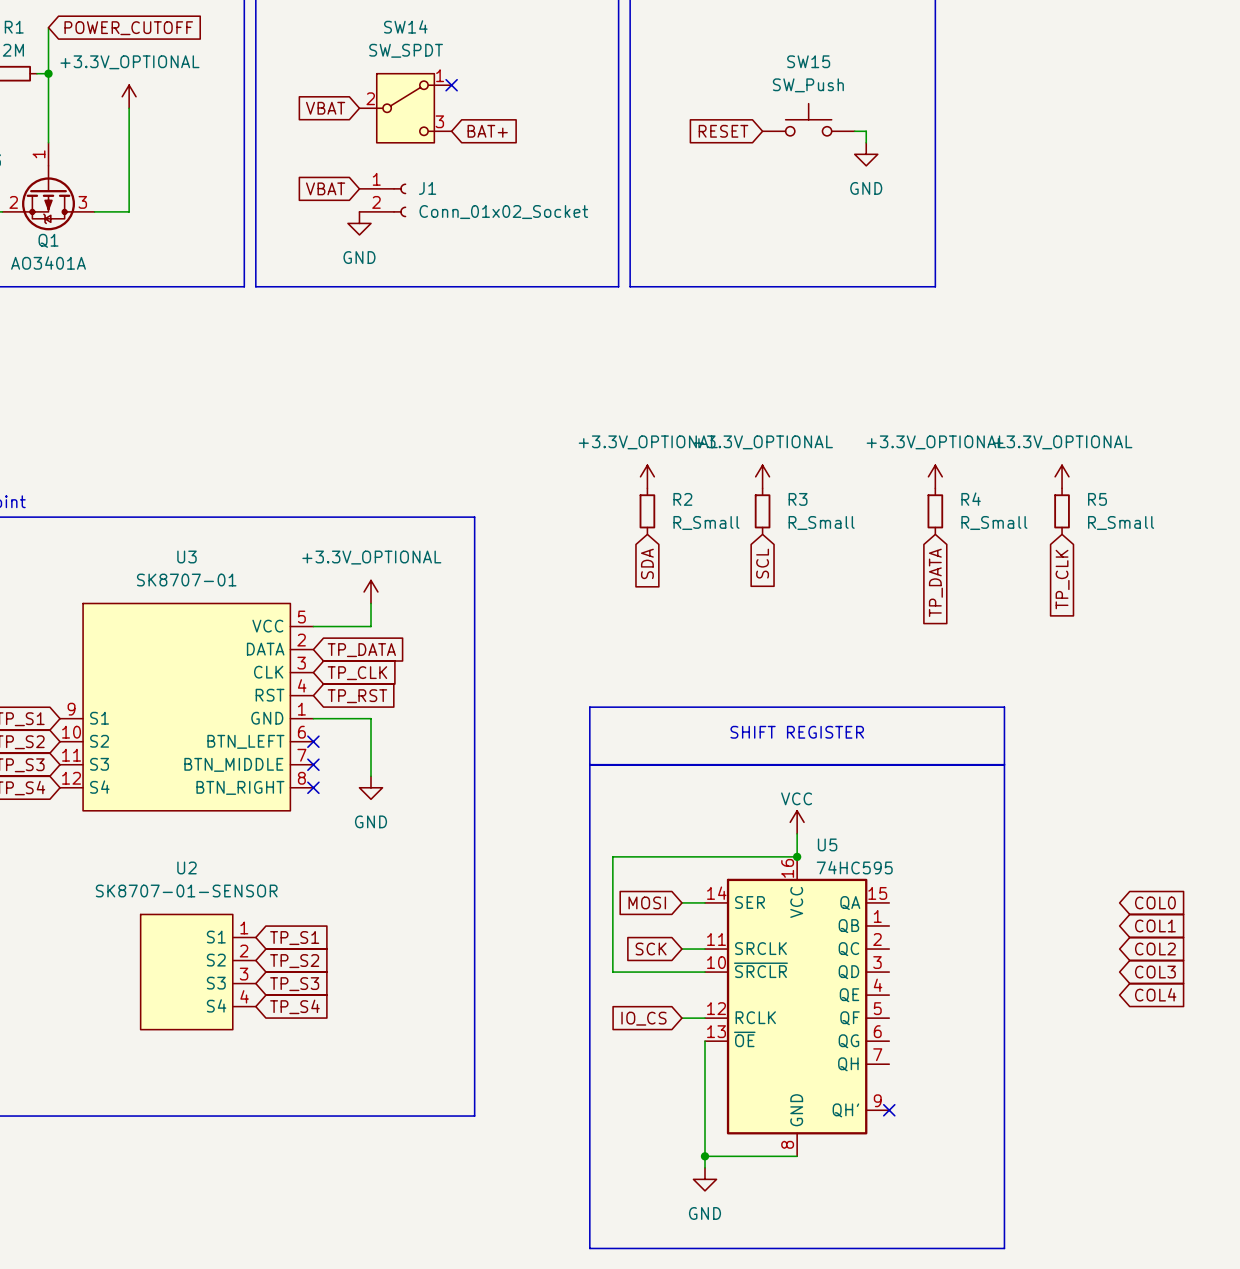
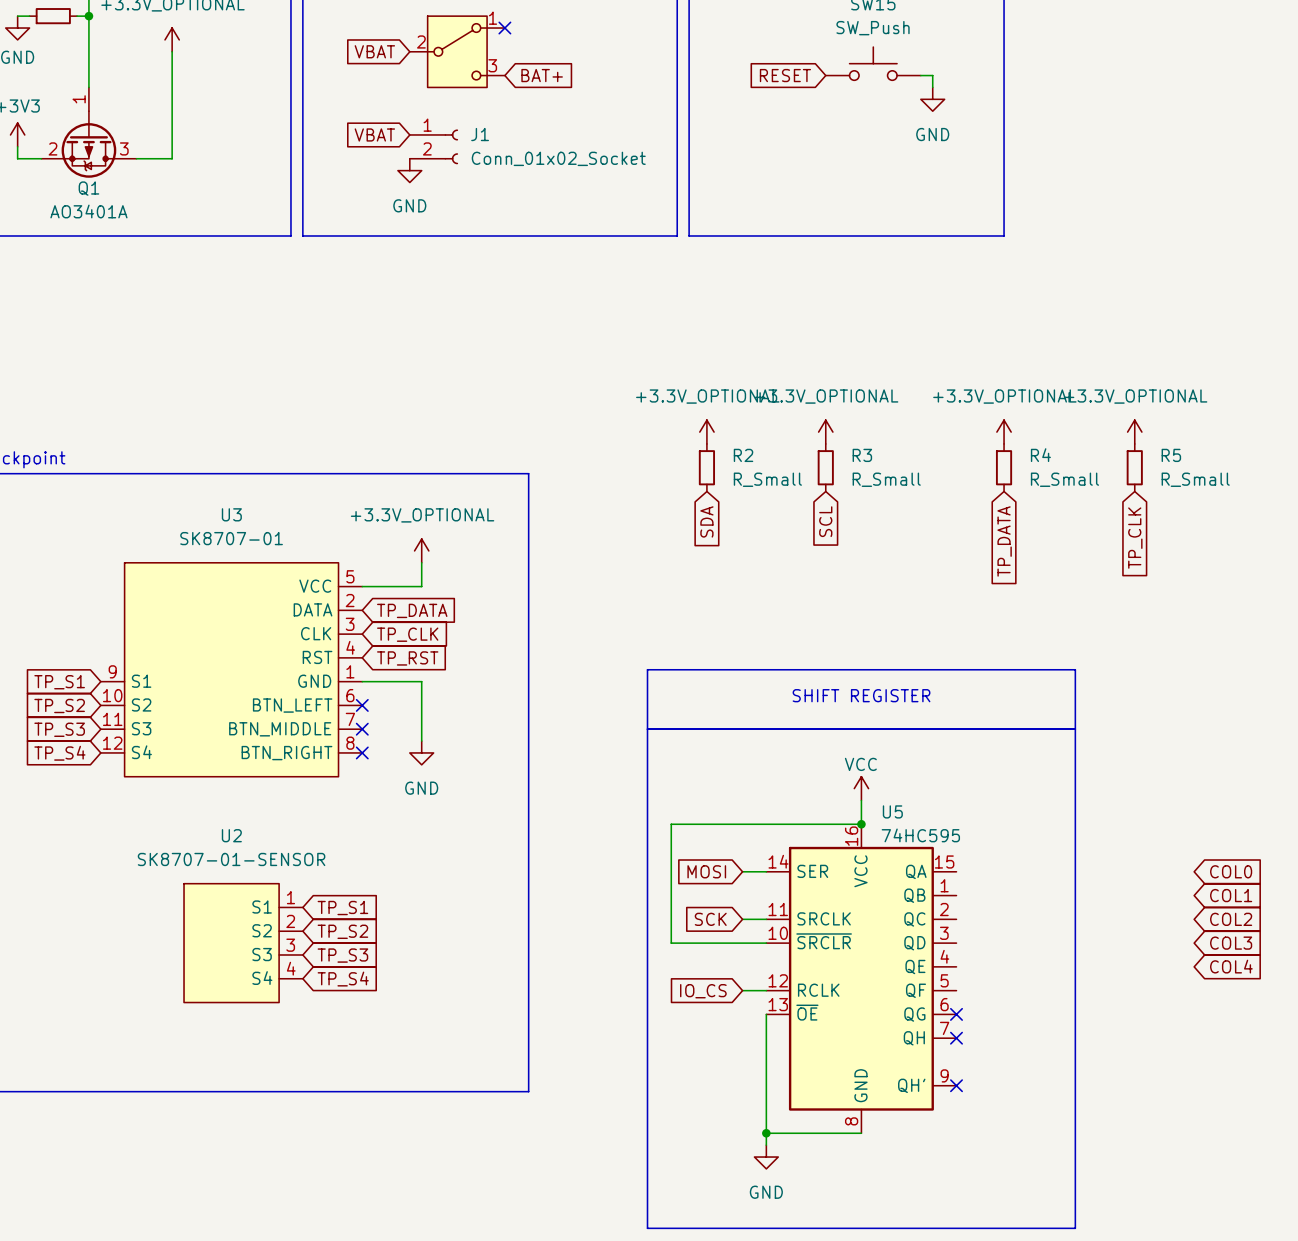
no-connect mark: none -> (956, 1014)
no-connect mark: none -> (956, 1038)

